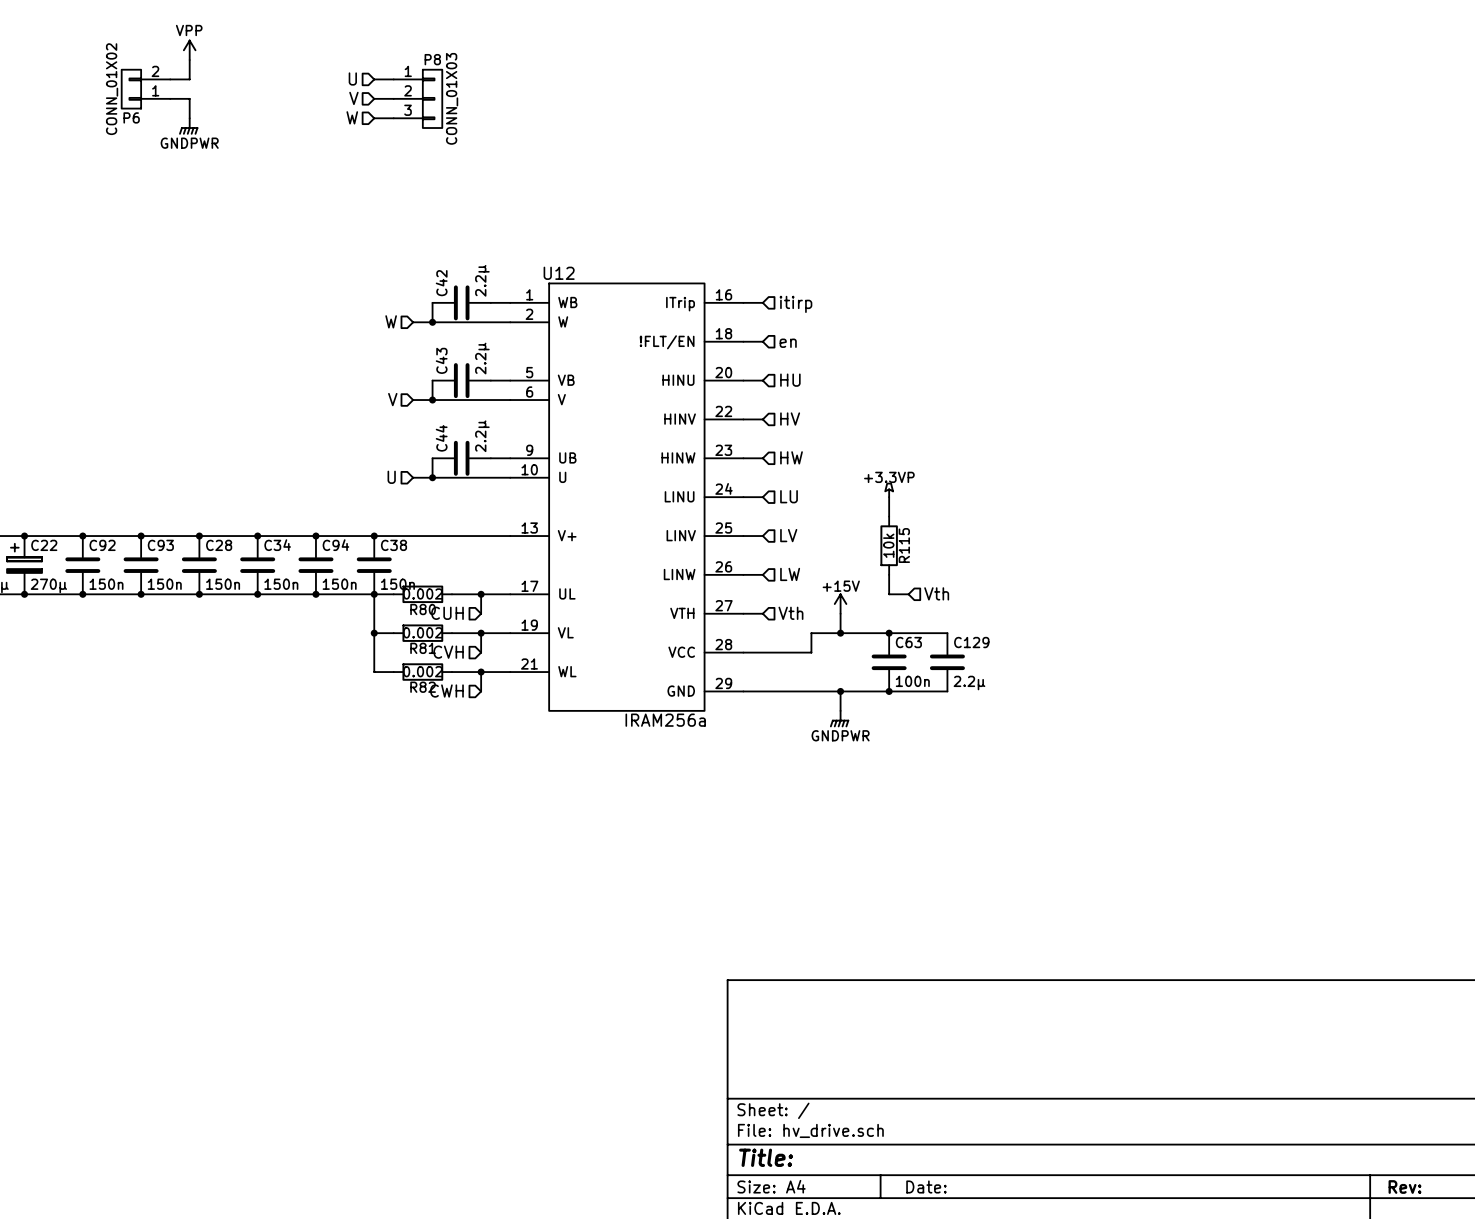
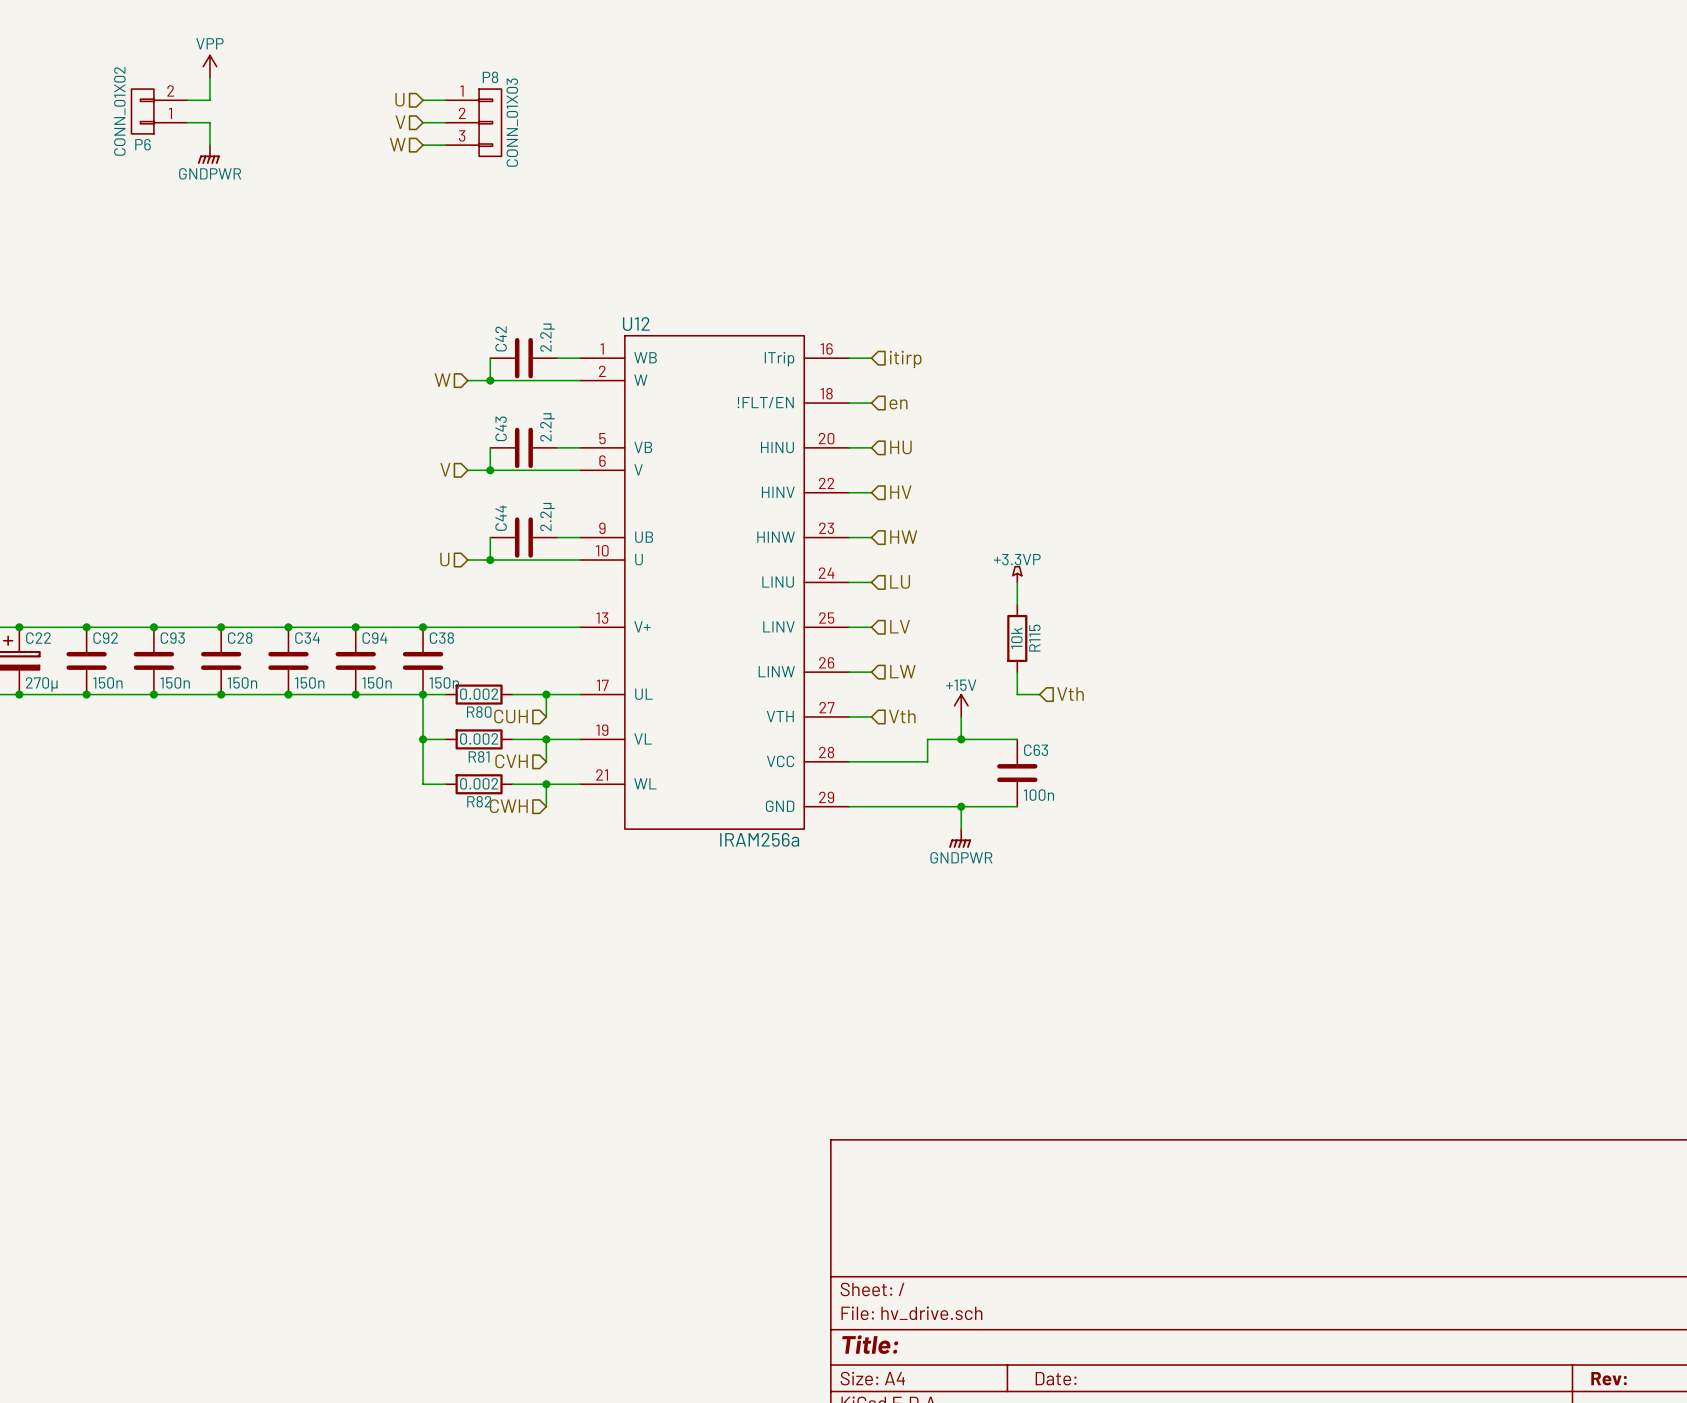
wire: (889, 633) (947, 633) -> none
junction: (889, 633) -> none
C129: 2.2µ (947, 662) -> none
wire: (889, 691) (947, 691) -> none
junction: (889, 691) -> none

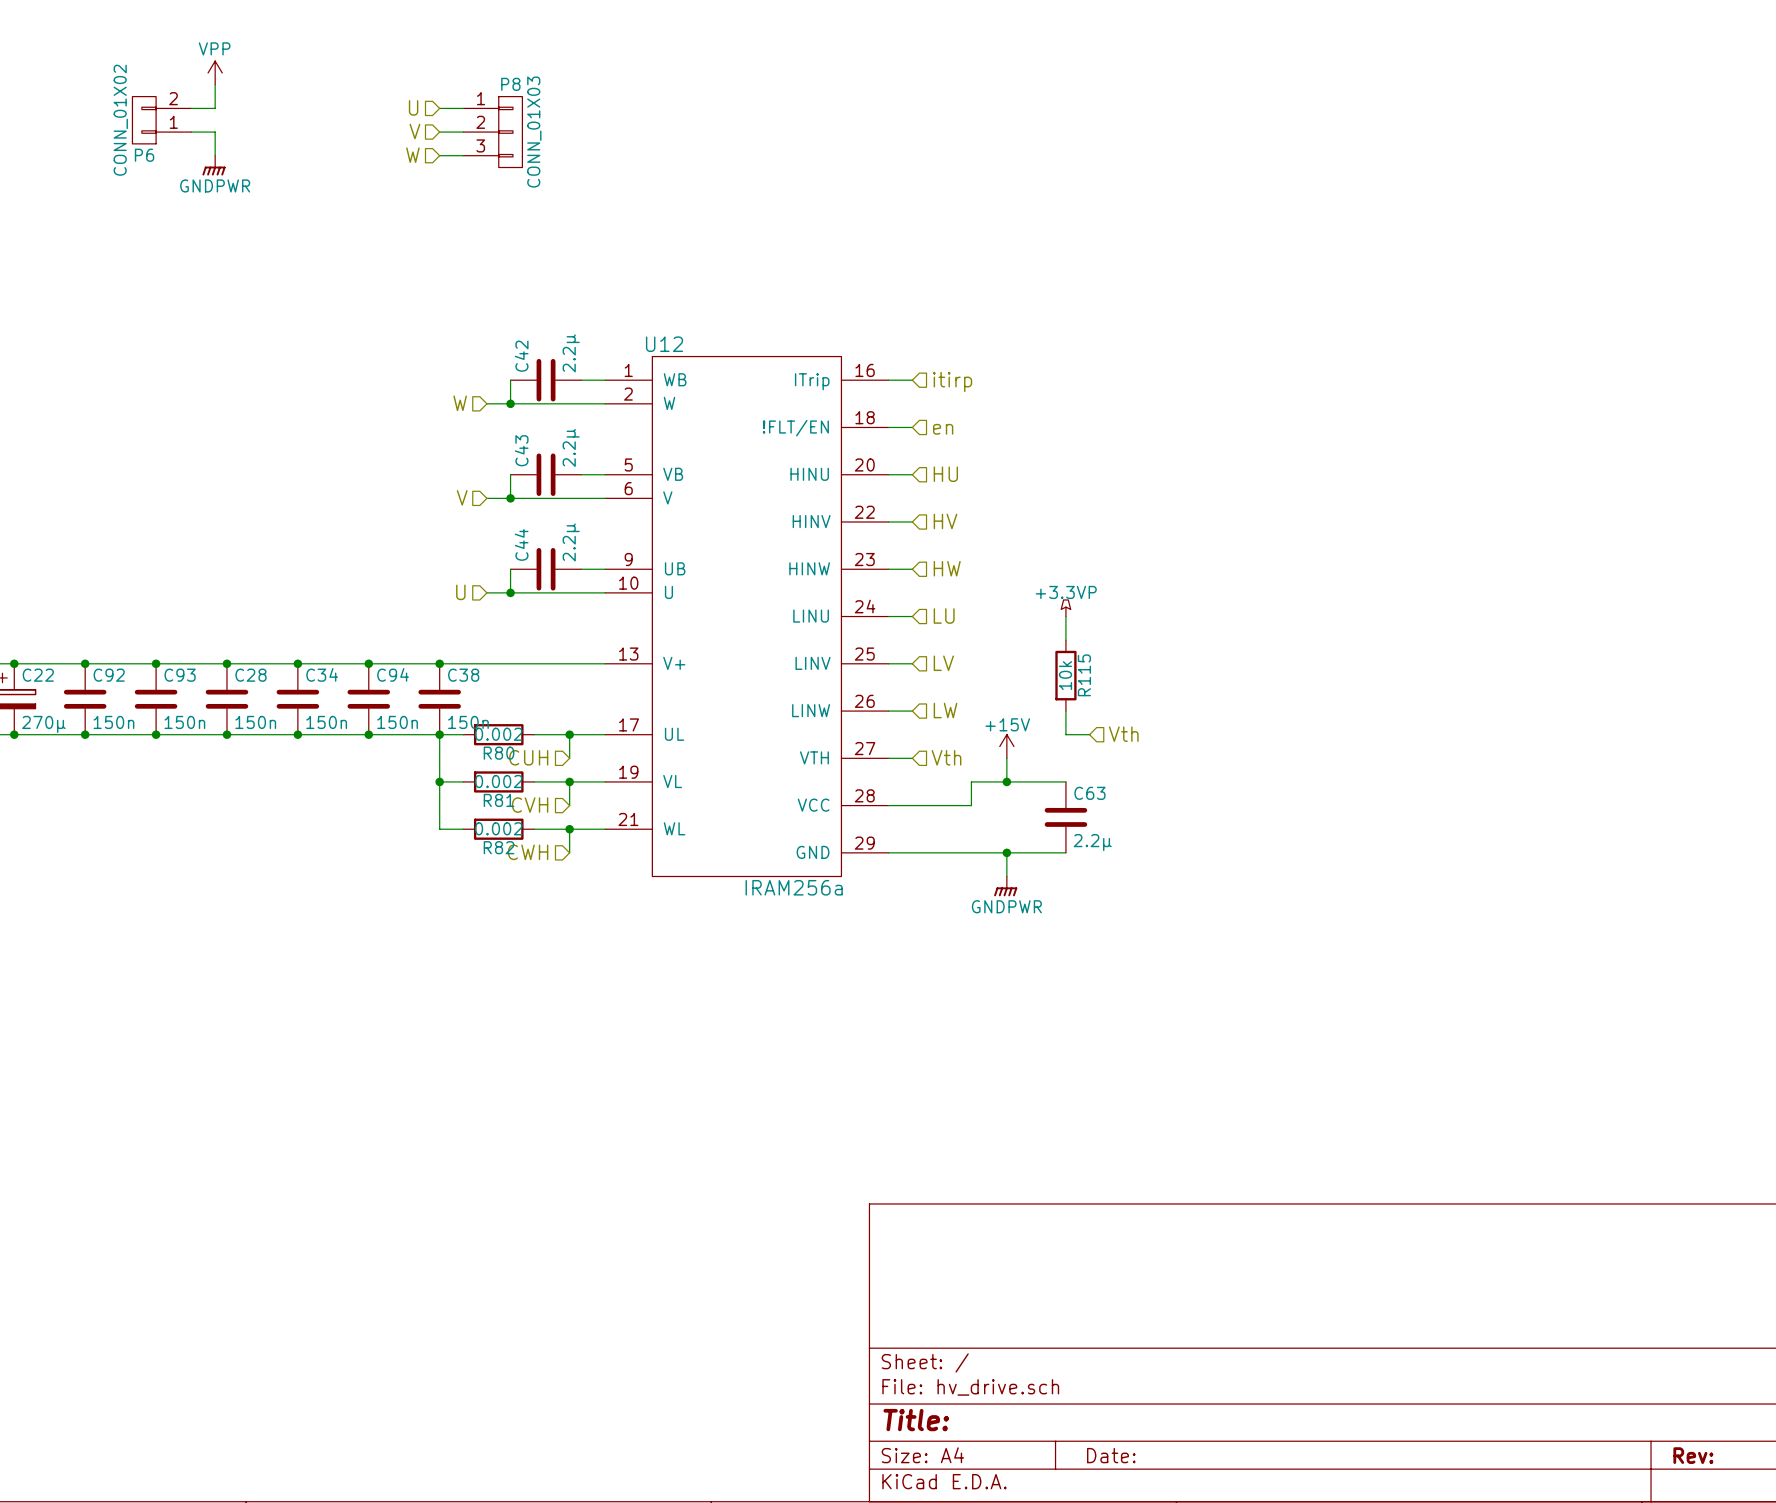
C63 value: 100n (1038, 795) -> 2.2µ (1092, 842)

